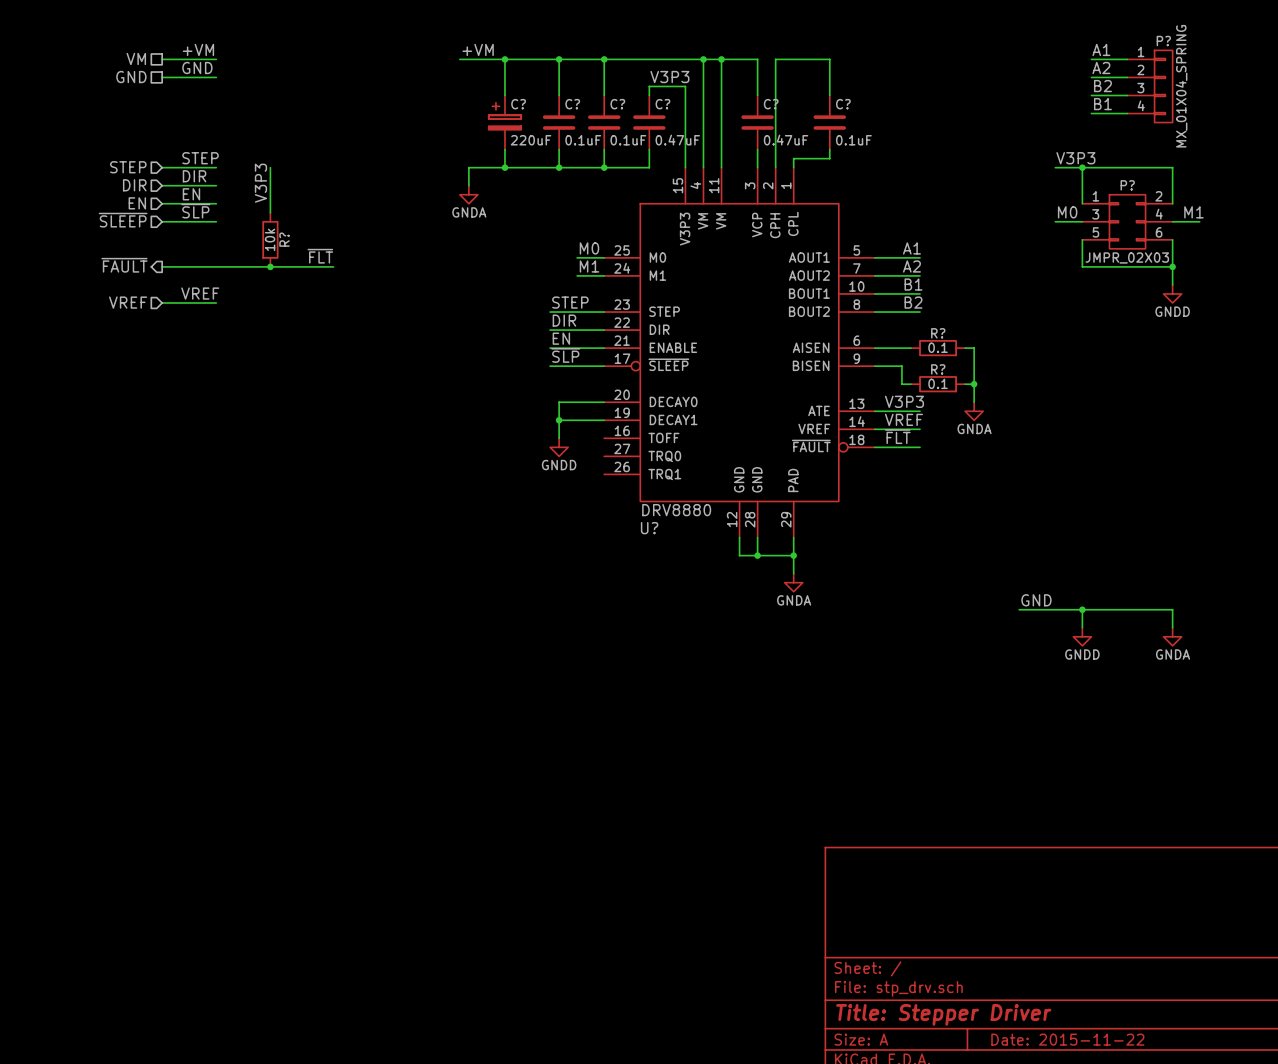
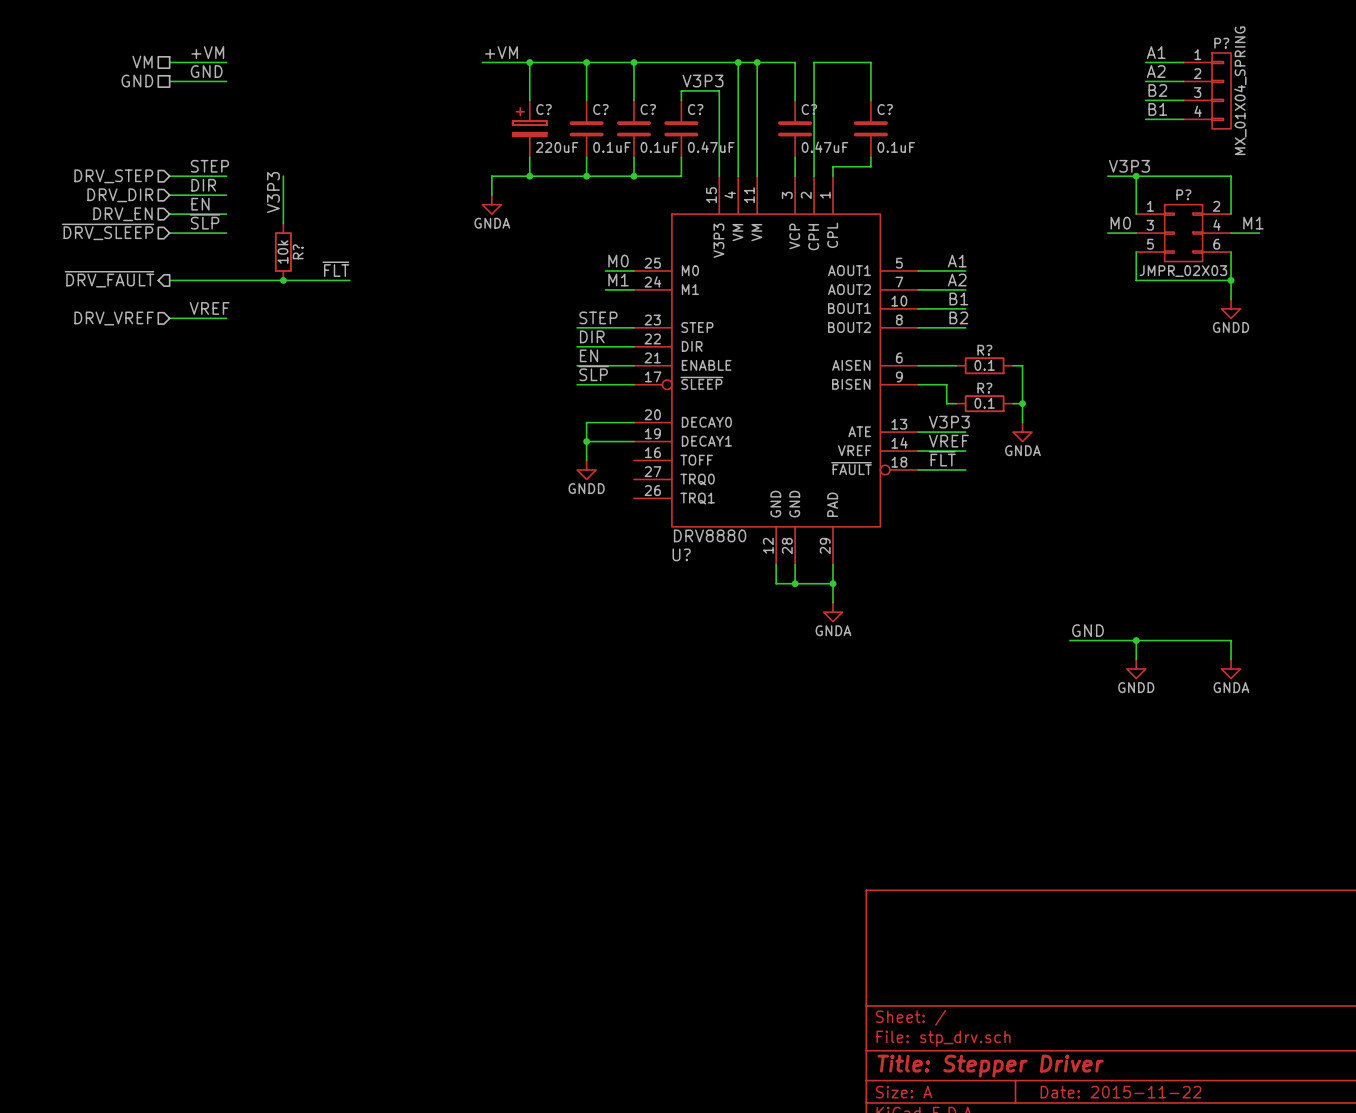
hierarchical label: STEP (128, 167) -> DRV_STEP (113, 176)
hierarchical label: DIR (134, 185) -> DRV_DIR (120, 195)
hierarchical label: EN (137, 203) -> DRV_EN (123, 214)
hierarchical label: ~{SLEEP} (123, 220) -> ~{DRV_SLEEP} (108, 231)
hierarchical label: ~{FAULT} (124, 265) -> ~{DRV_FAULT} (109, 279)
hierarchical label: VREF (128, 302) -> DRV_VREF (114, 318)

